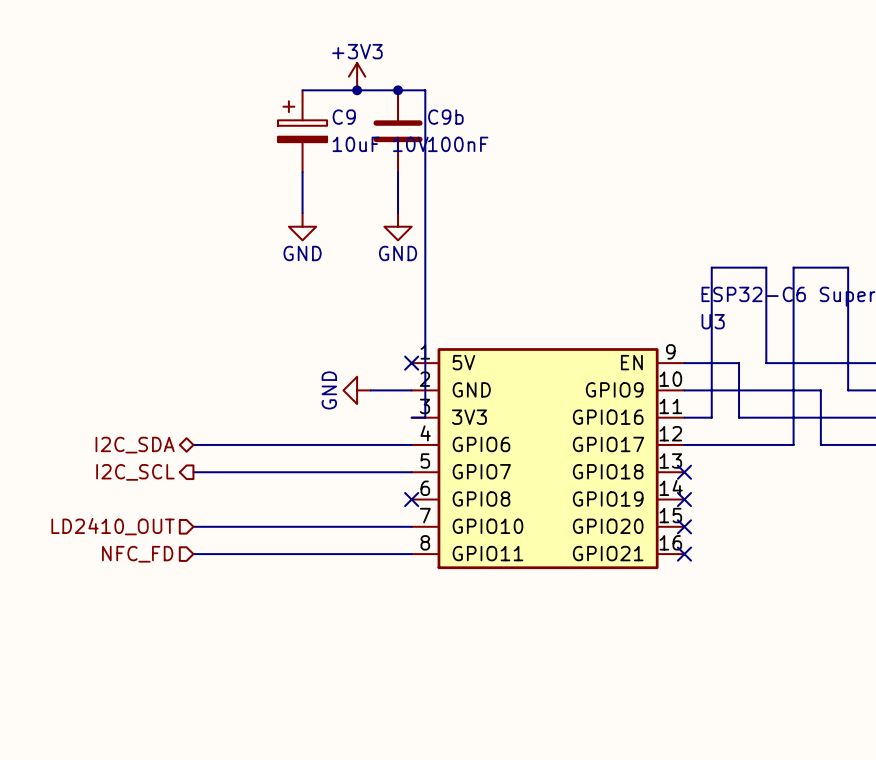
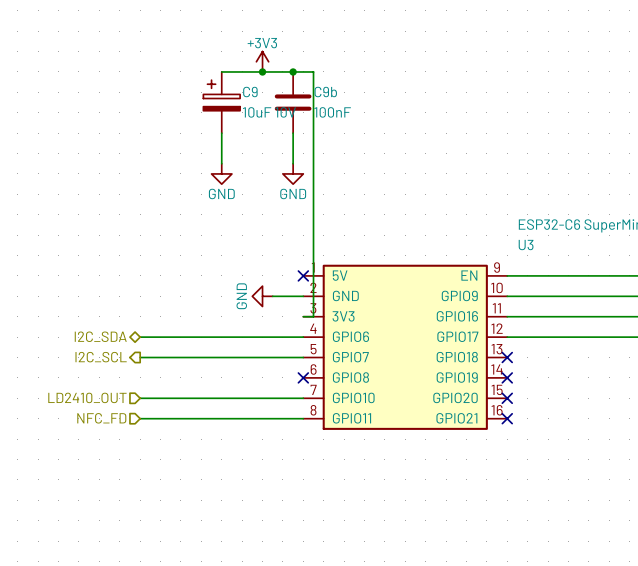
wire: (739, 363) (739, 417) -> (548, 275) (568, 275)
wire: (766, 363) (766, 267) (711, 267) (711, 417) -> (548, 316) (527, 316)
wire: (820, 390) (820, 444) -> (609, 296) (629, 296)
wire: (848, 390) (848, 267) (793, 267) (793, 444) -> (609, 337) (588, 337)

